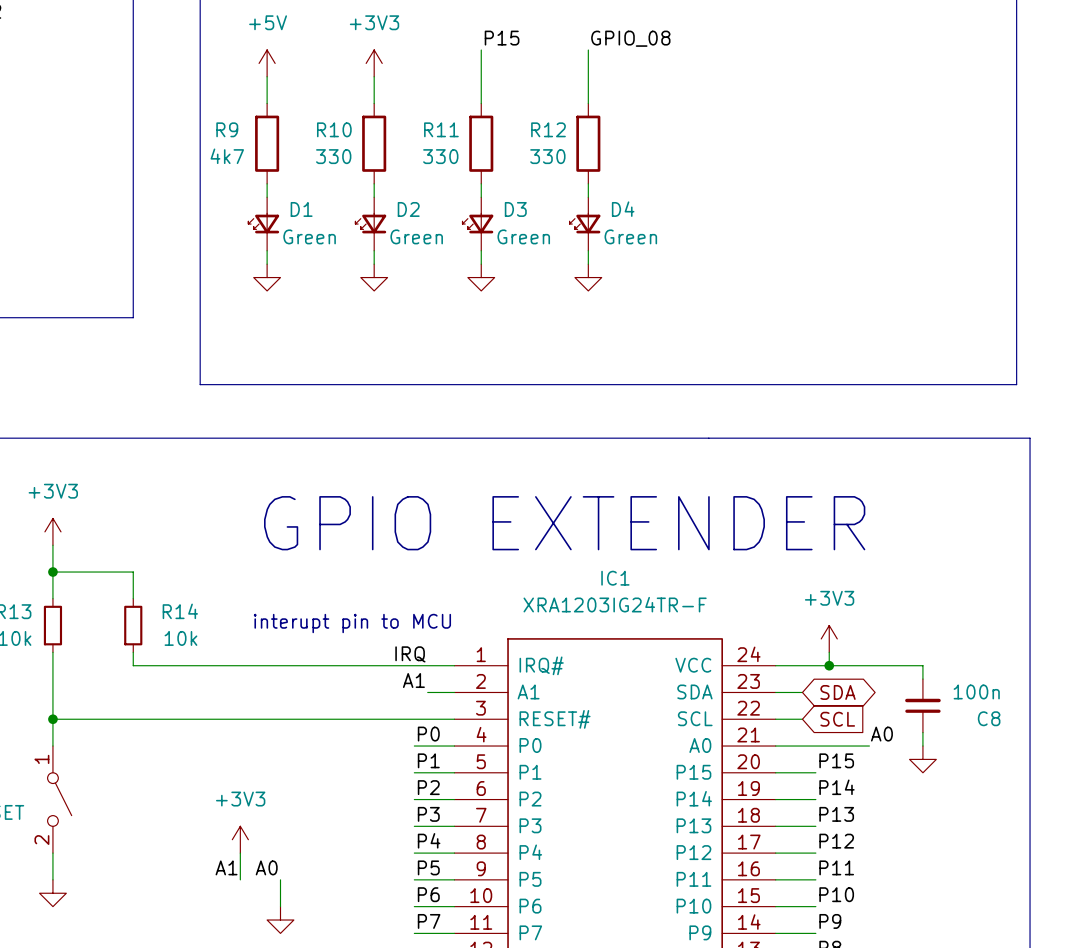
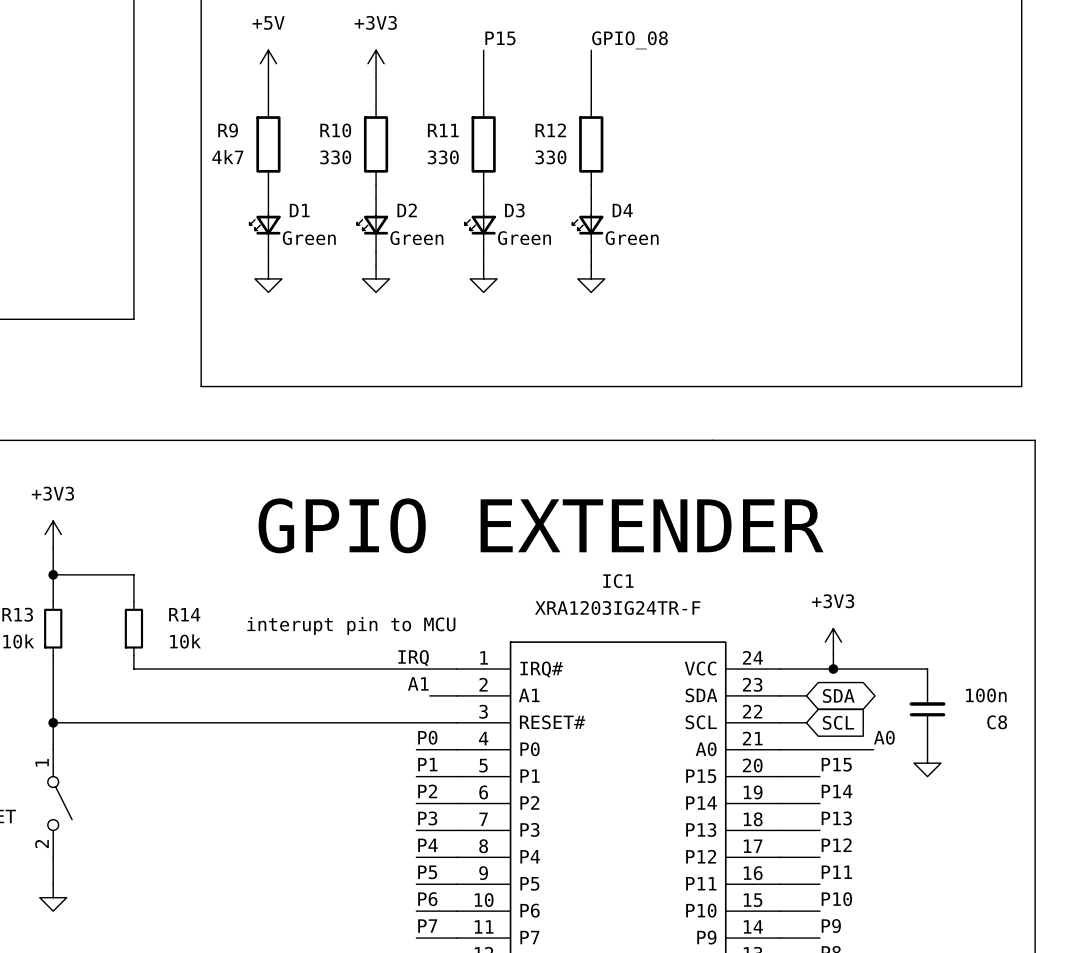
power symbol: +3V3 (240, 839) -> none
wire: (240, 853) (240, 879) -> none
label: A1 (226, 867) -> none
label: A0 (266, 867) -> none
wire: (280, 879) (280, 906) -> none
power symbol: (280, 920) -> none

